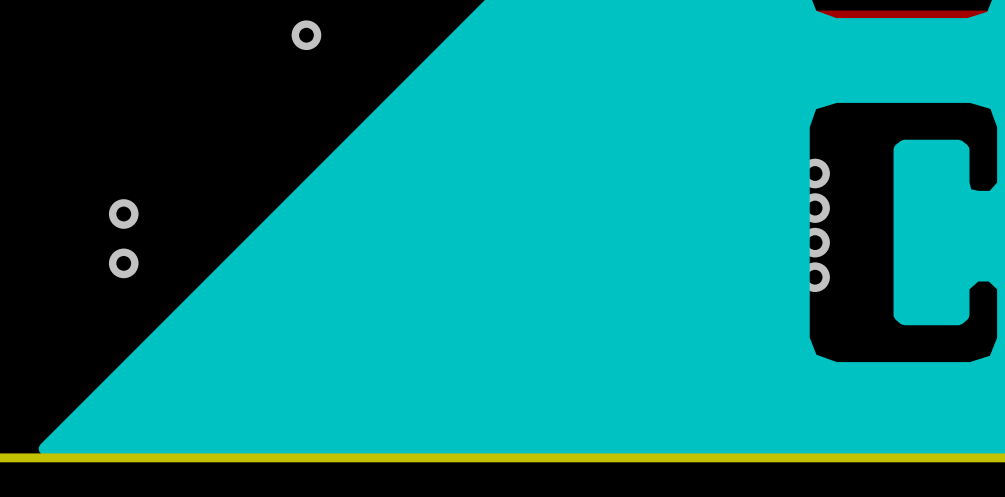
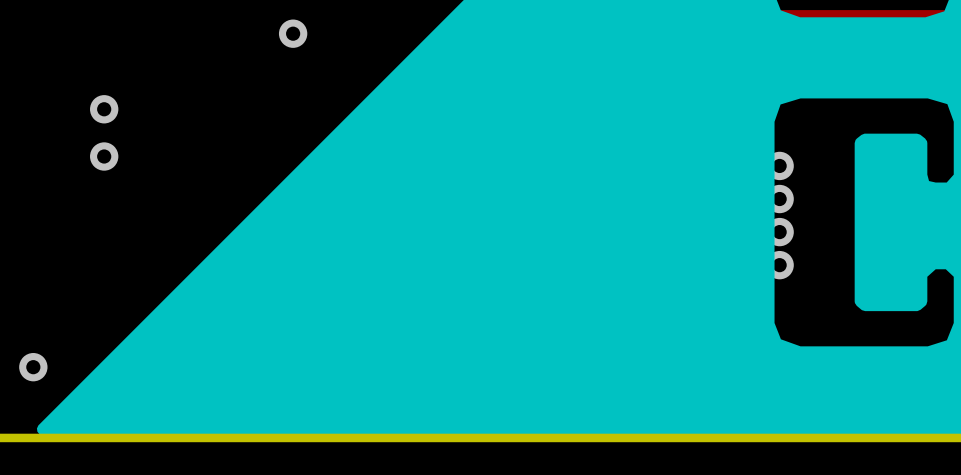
via: none -> (104, 109)
via: none -> (104, 156)
via: (123, 213) -> none
via: (123, 263) -> none
via: none -> (33, 367)

